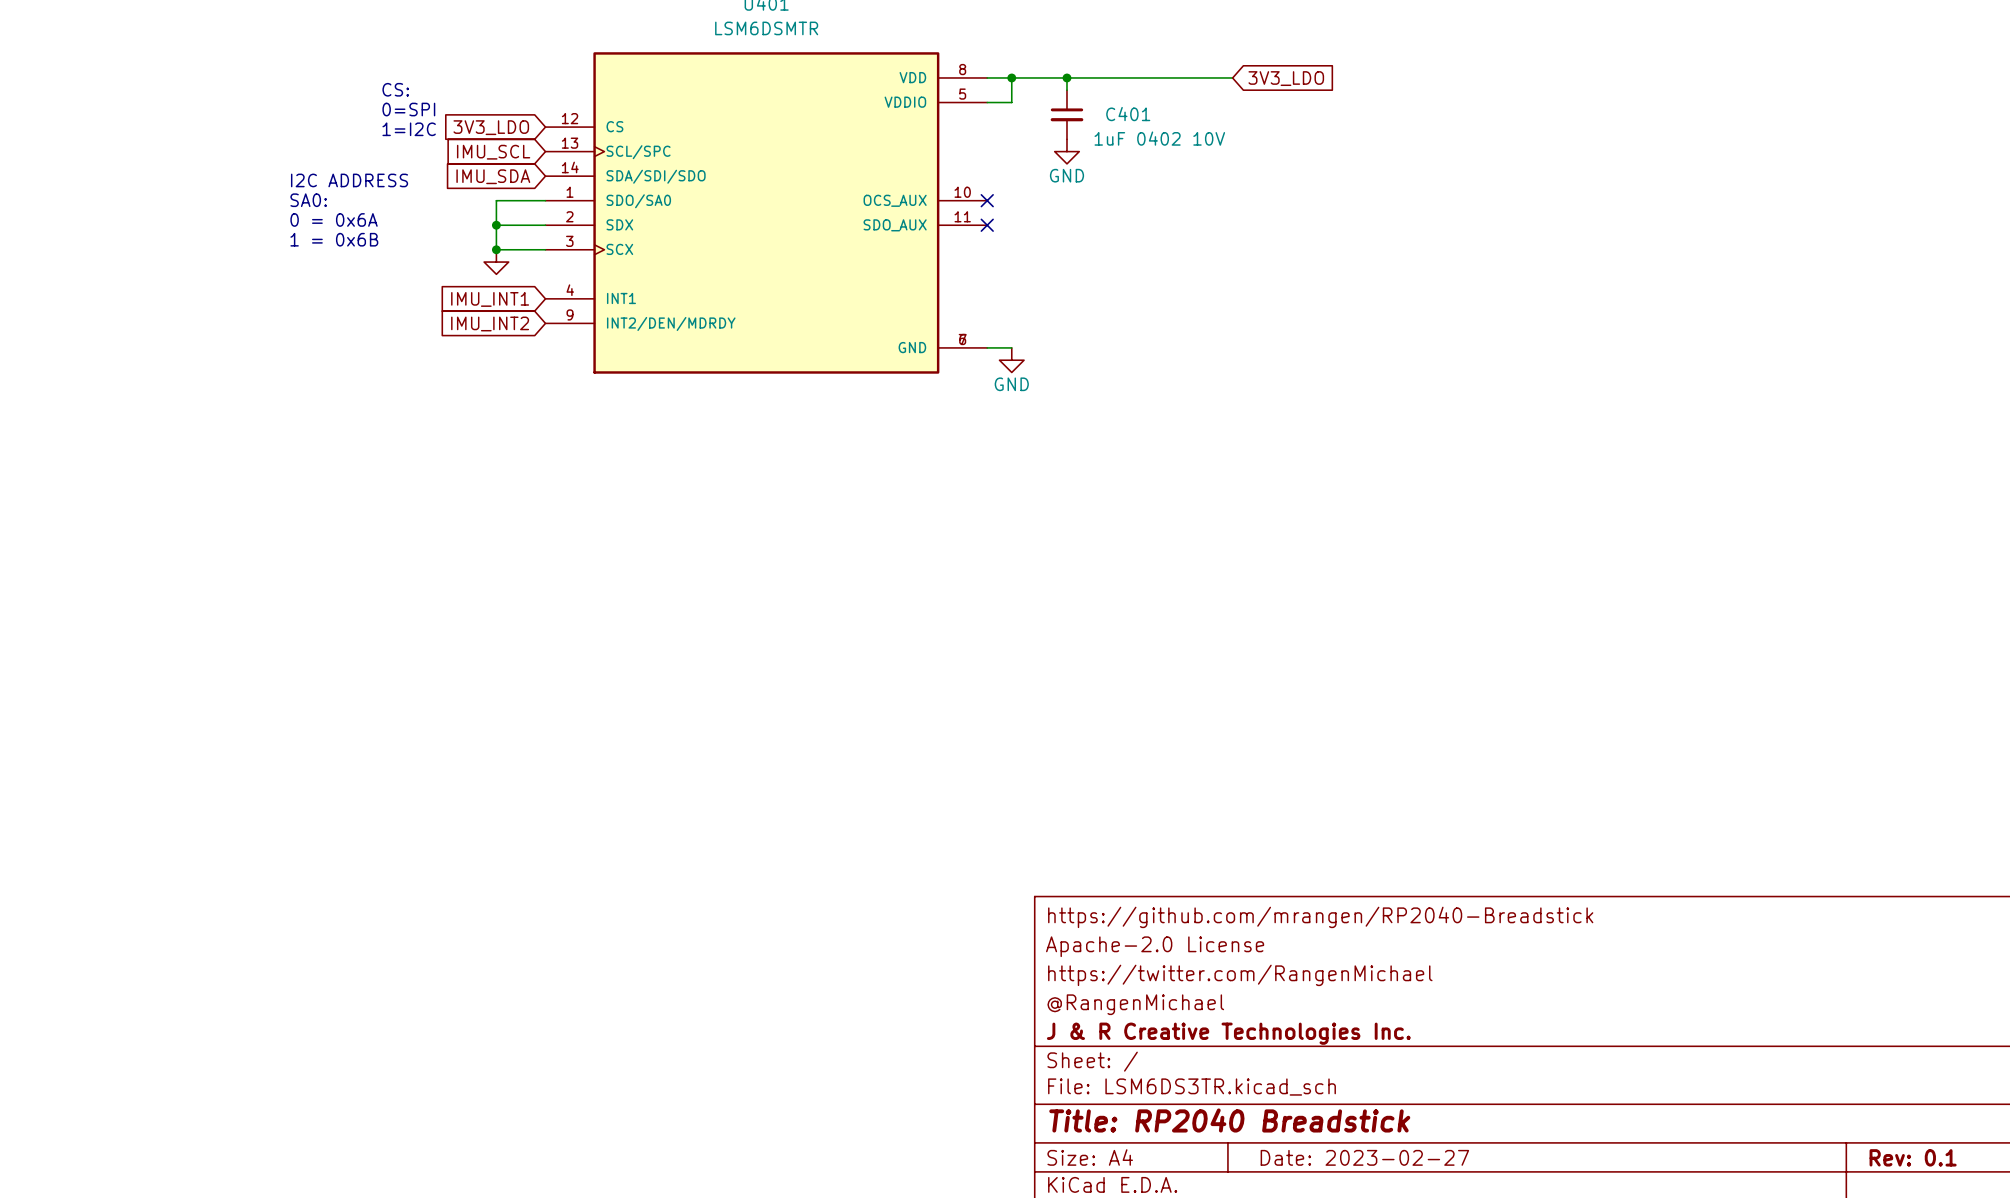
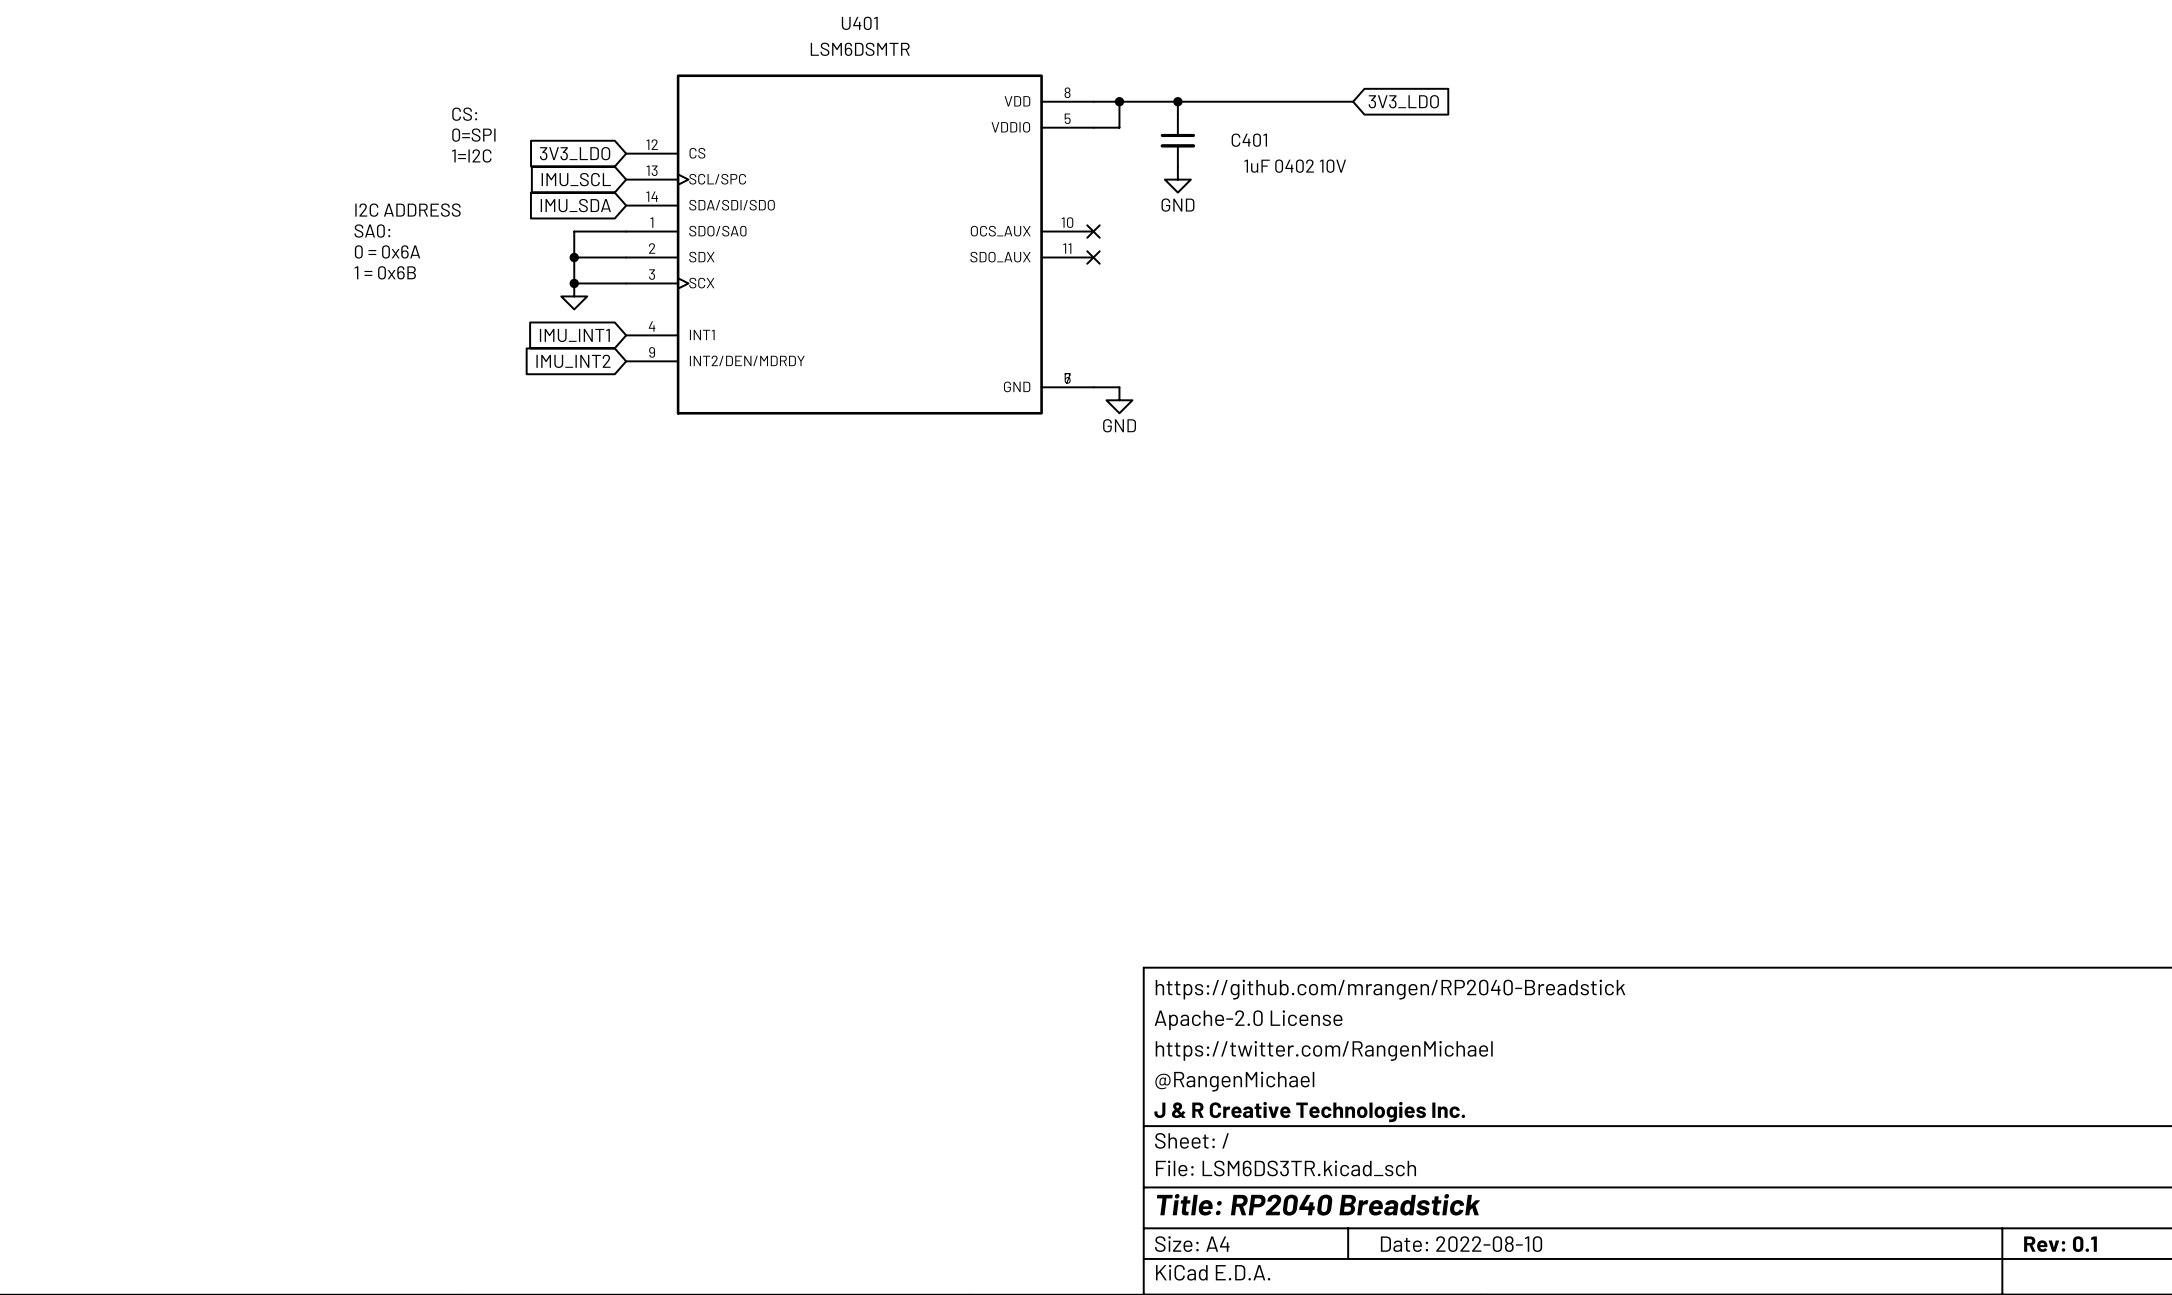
title block: Date: 2023-02-27 (1364, 1157) -> Date: 2022-08-10 (1461, 1244)

